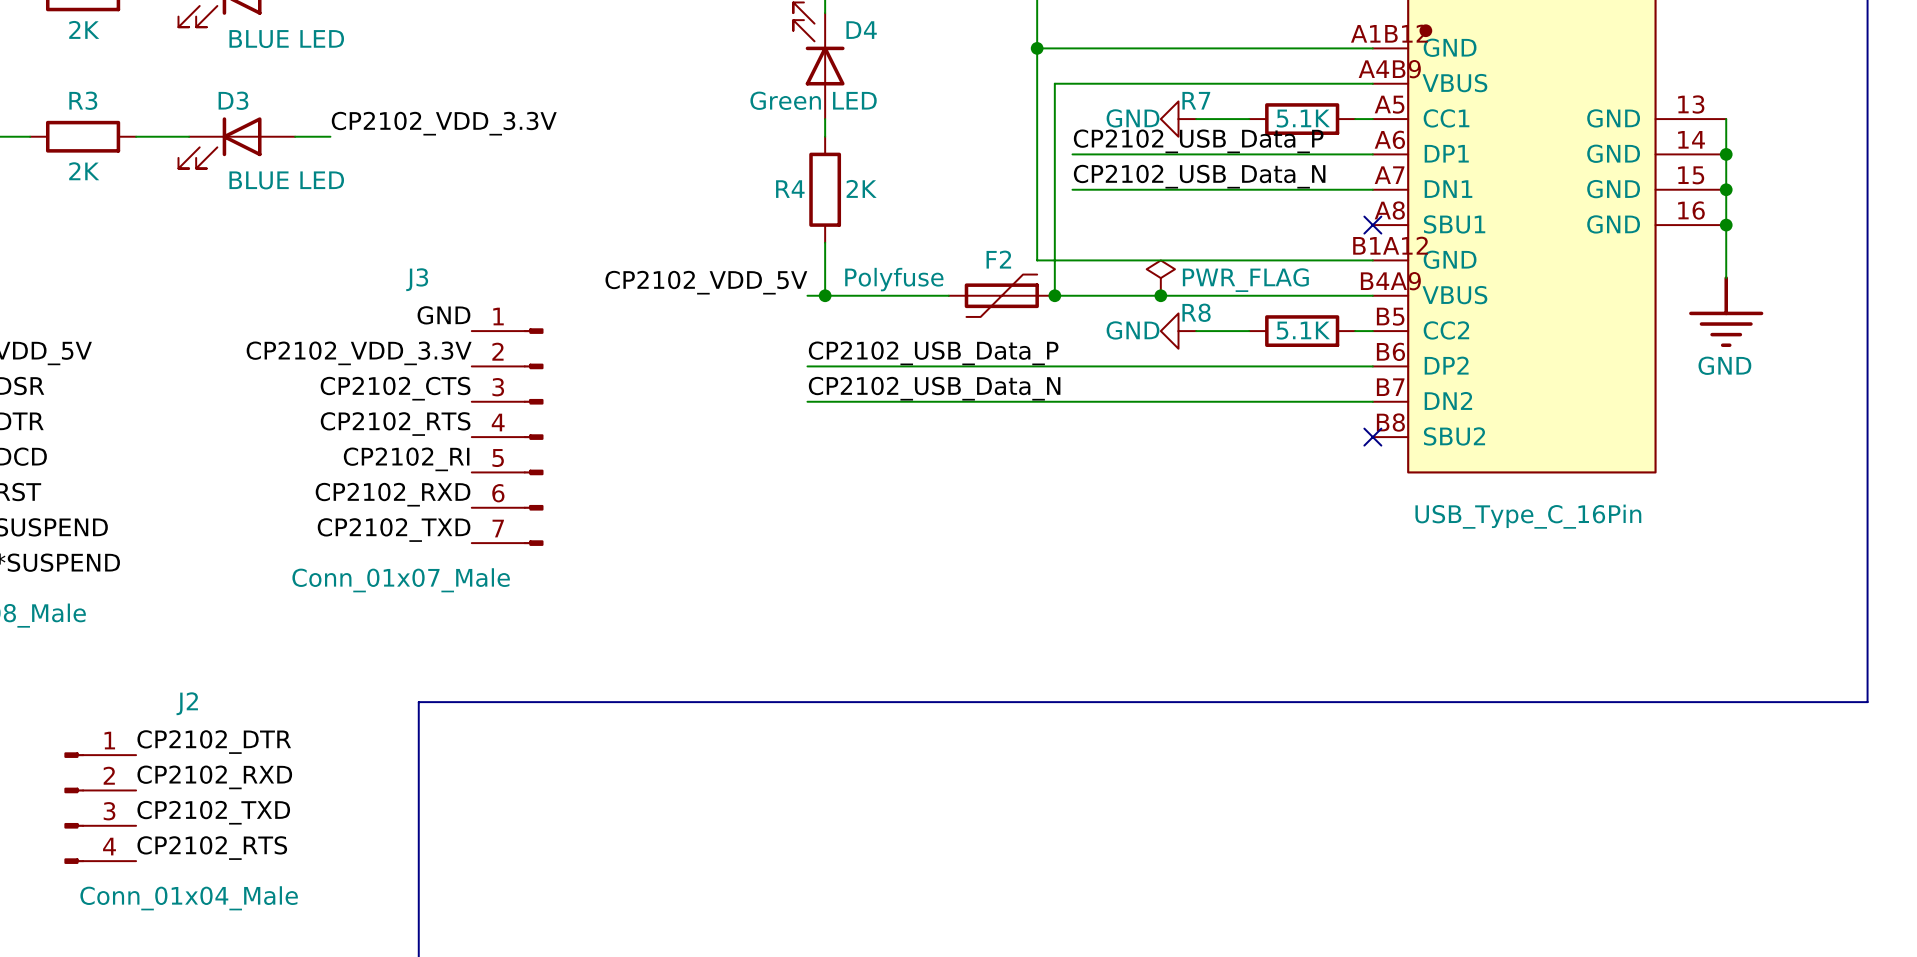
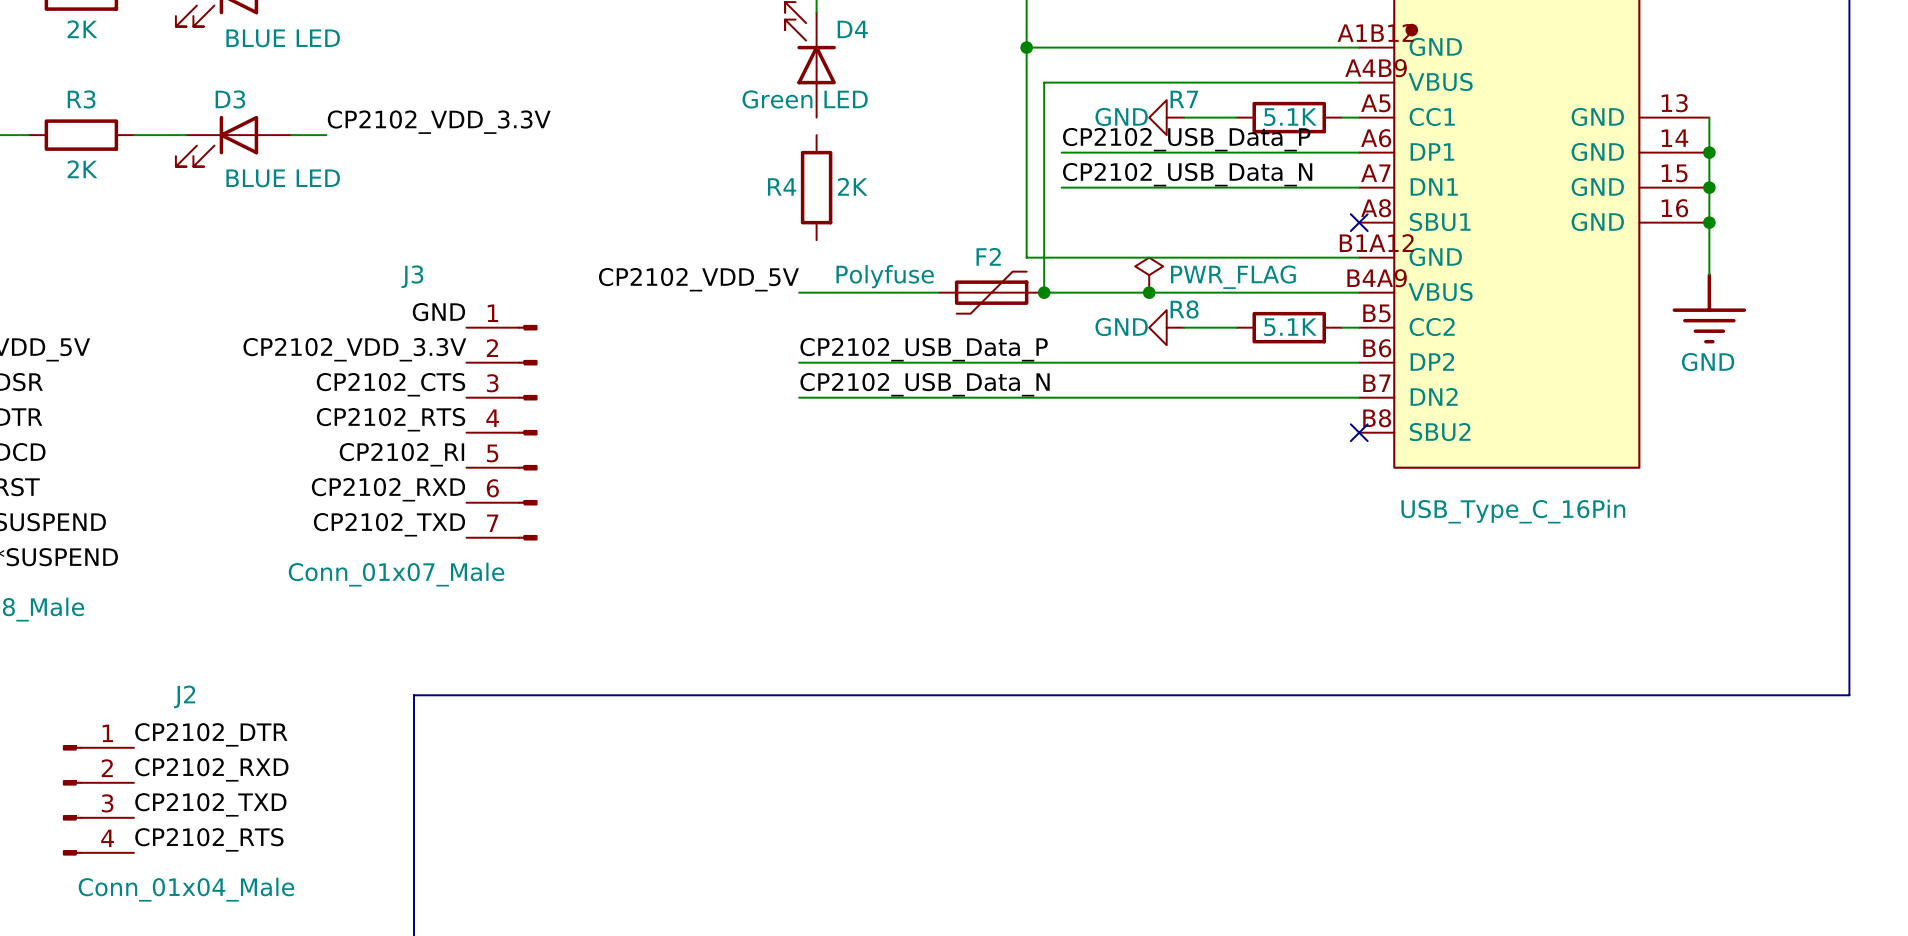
wire: (825, 119) (825, 136) -> none
wire: (825, 242) (825, 295) -> none
junction: (825, 295) -> none

